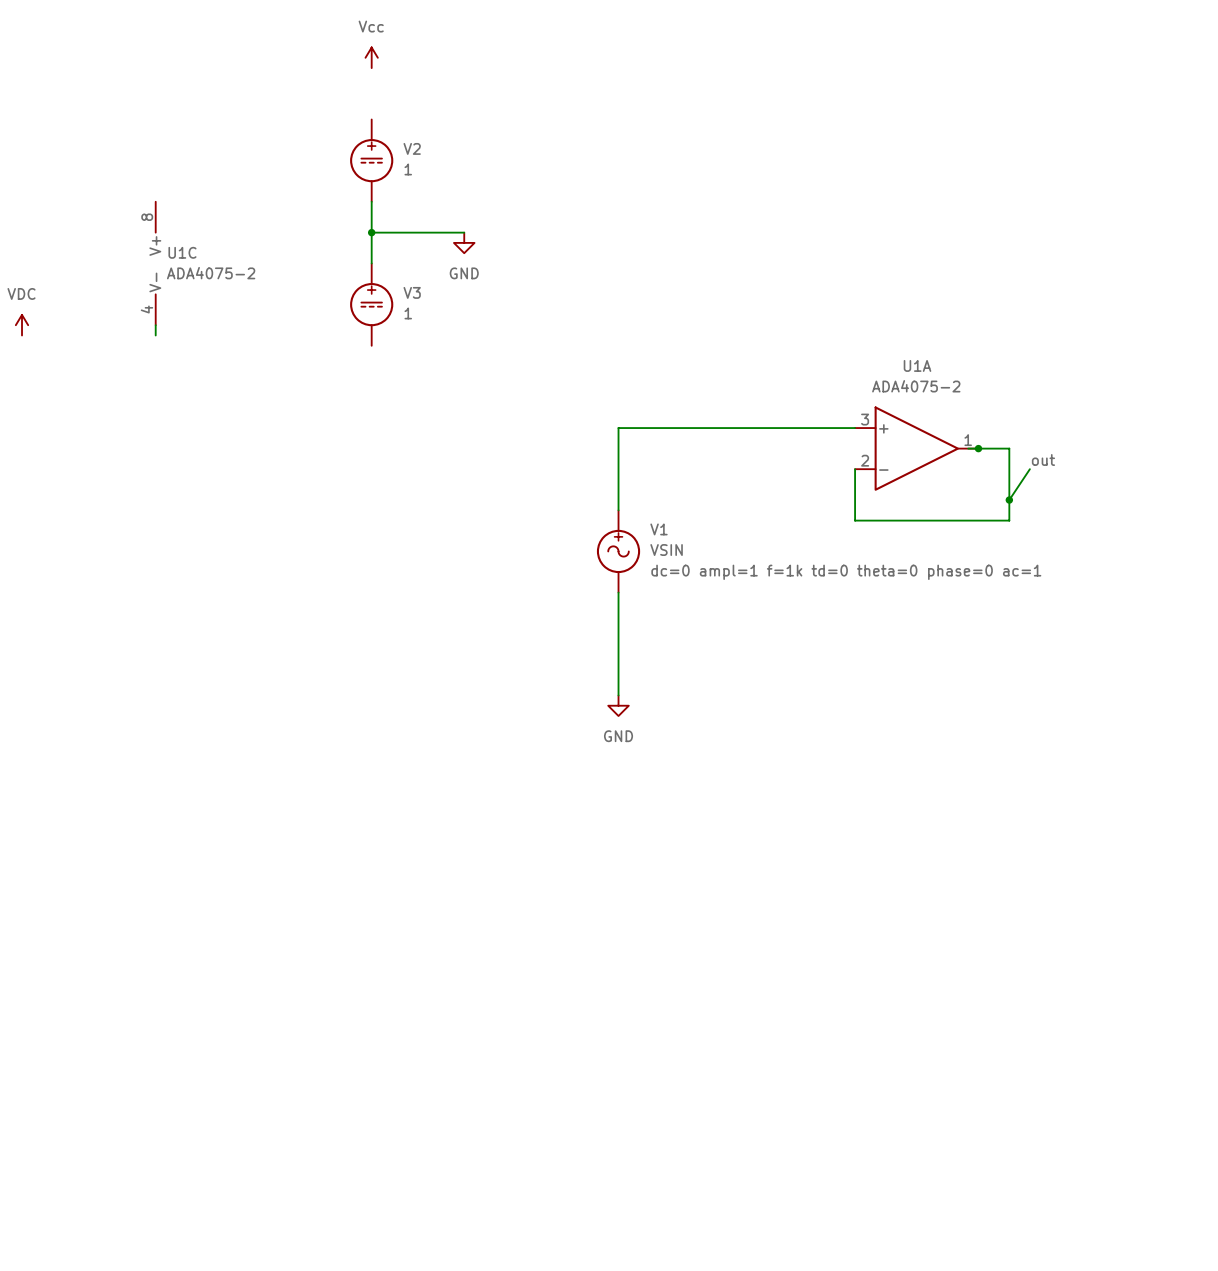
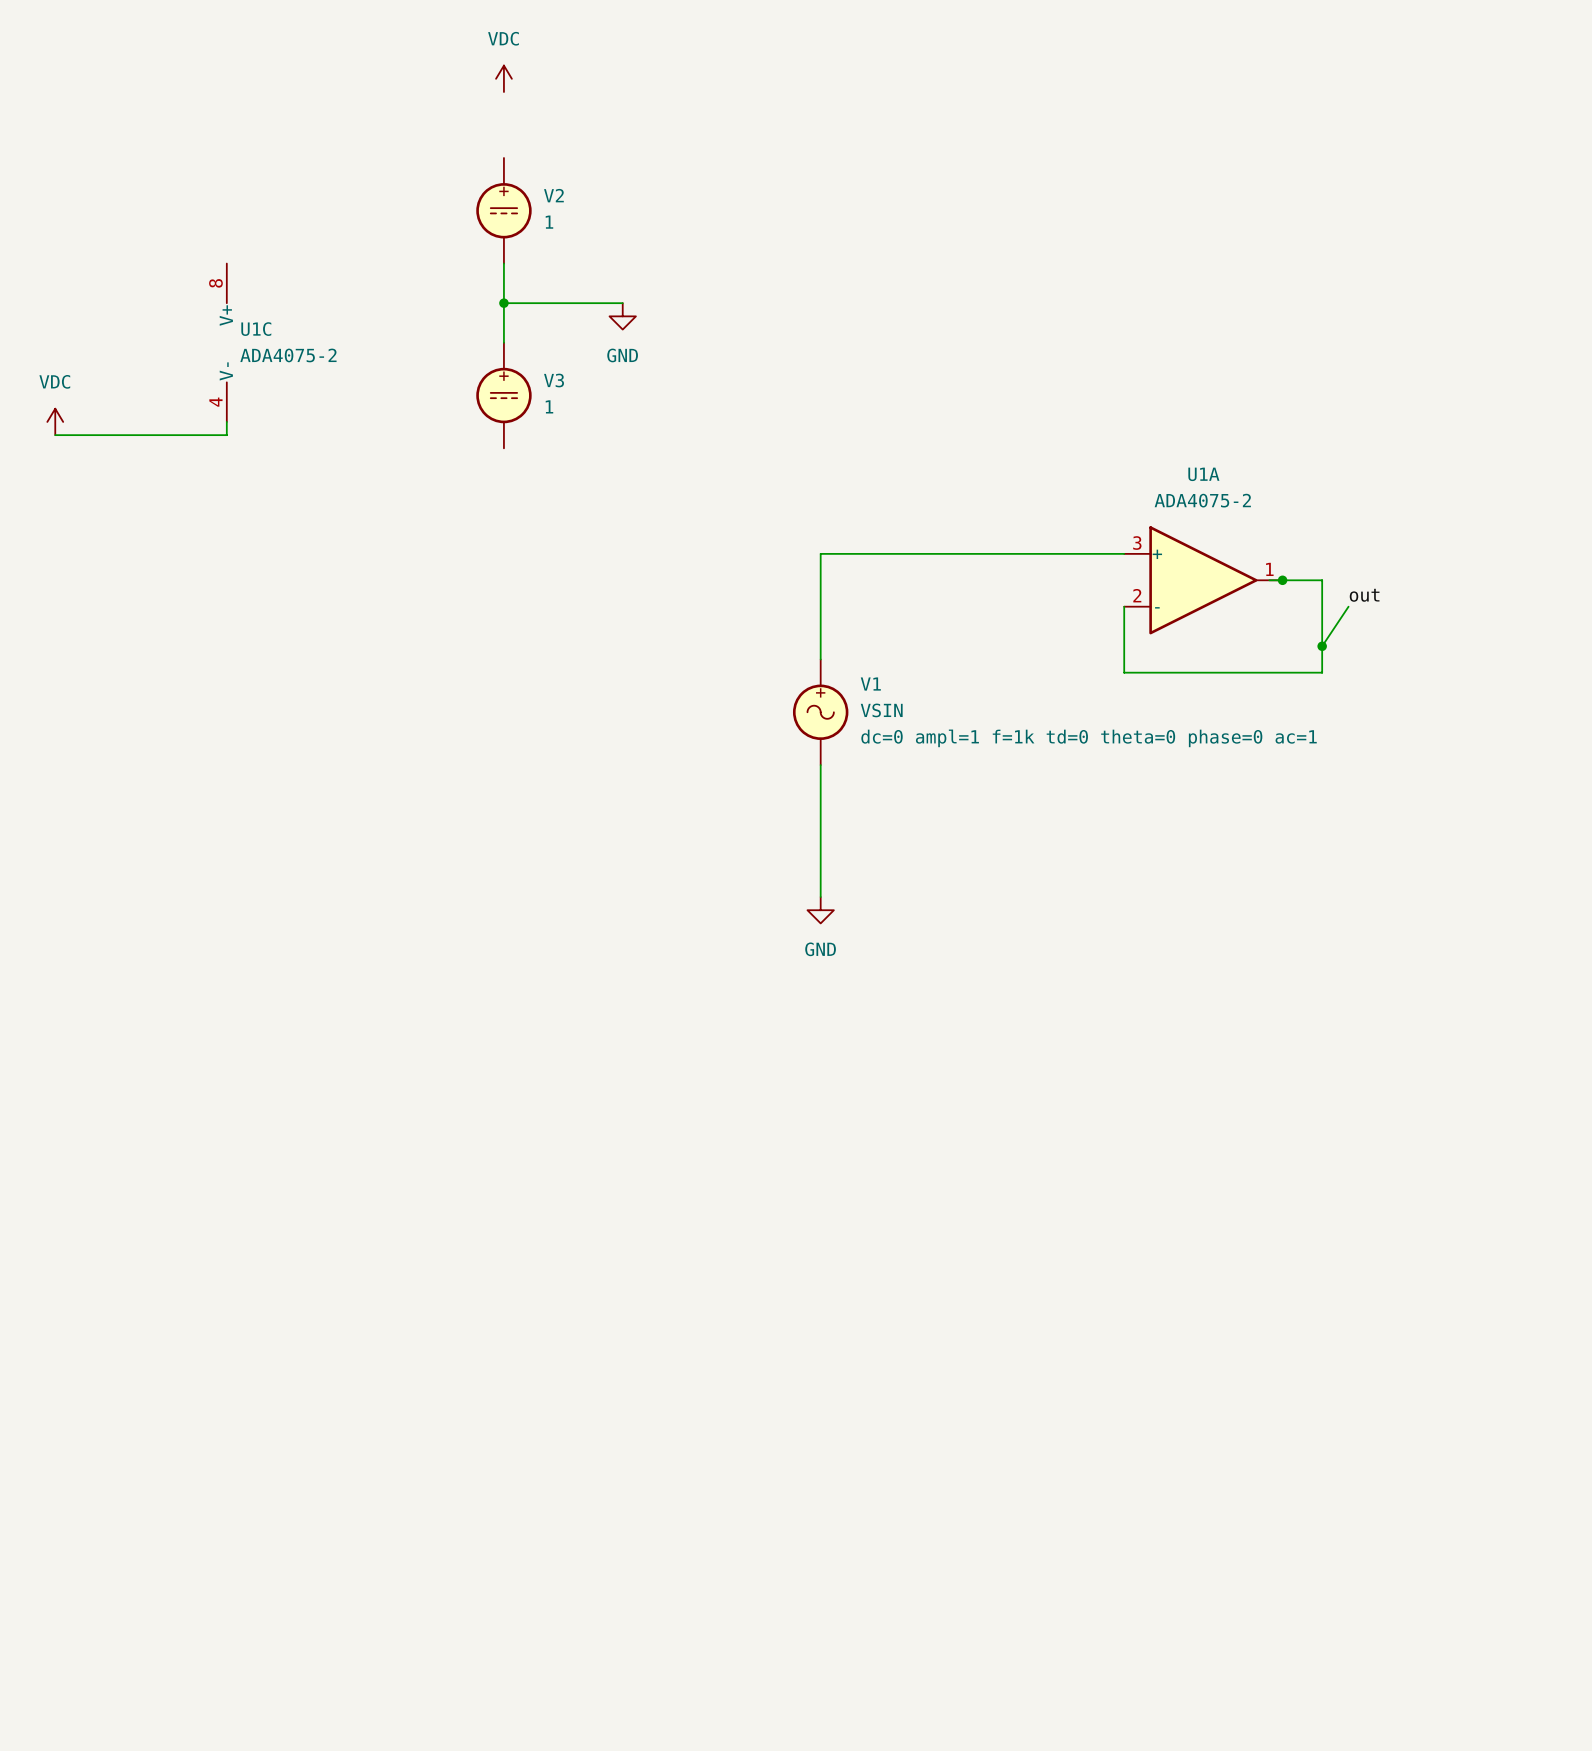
power symbol: Vcc (371, 57) -> VDC (503, 78)
wire: none -> (55, 435) (226, 435)

